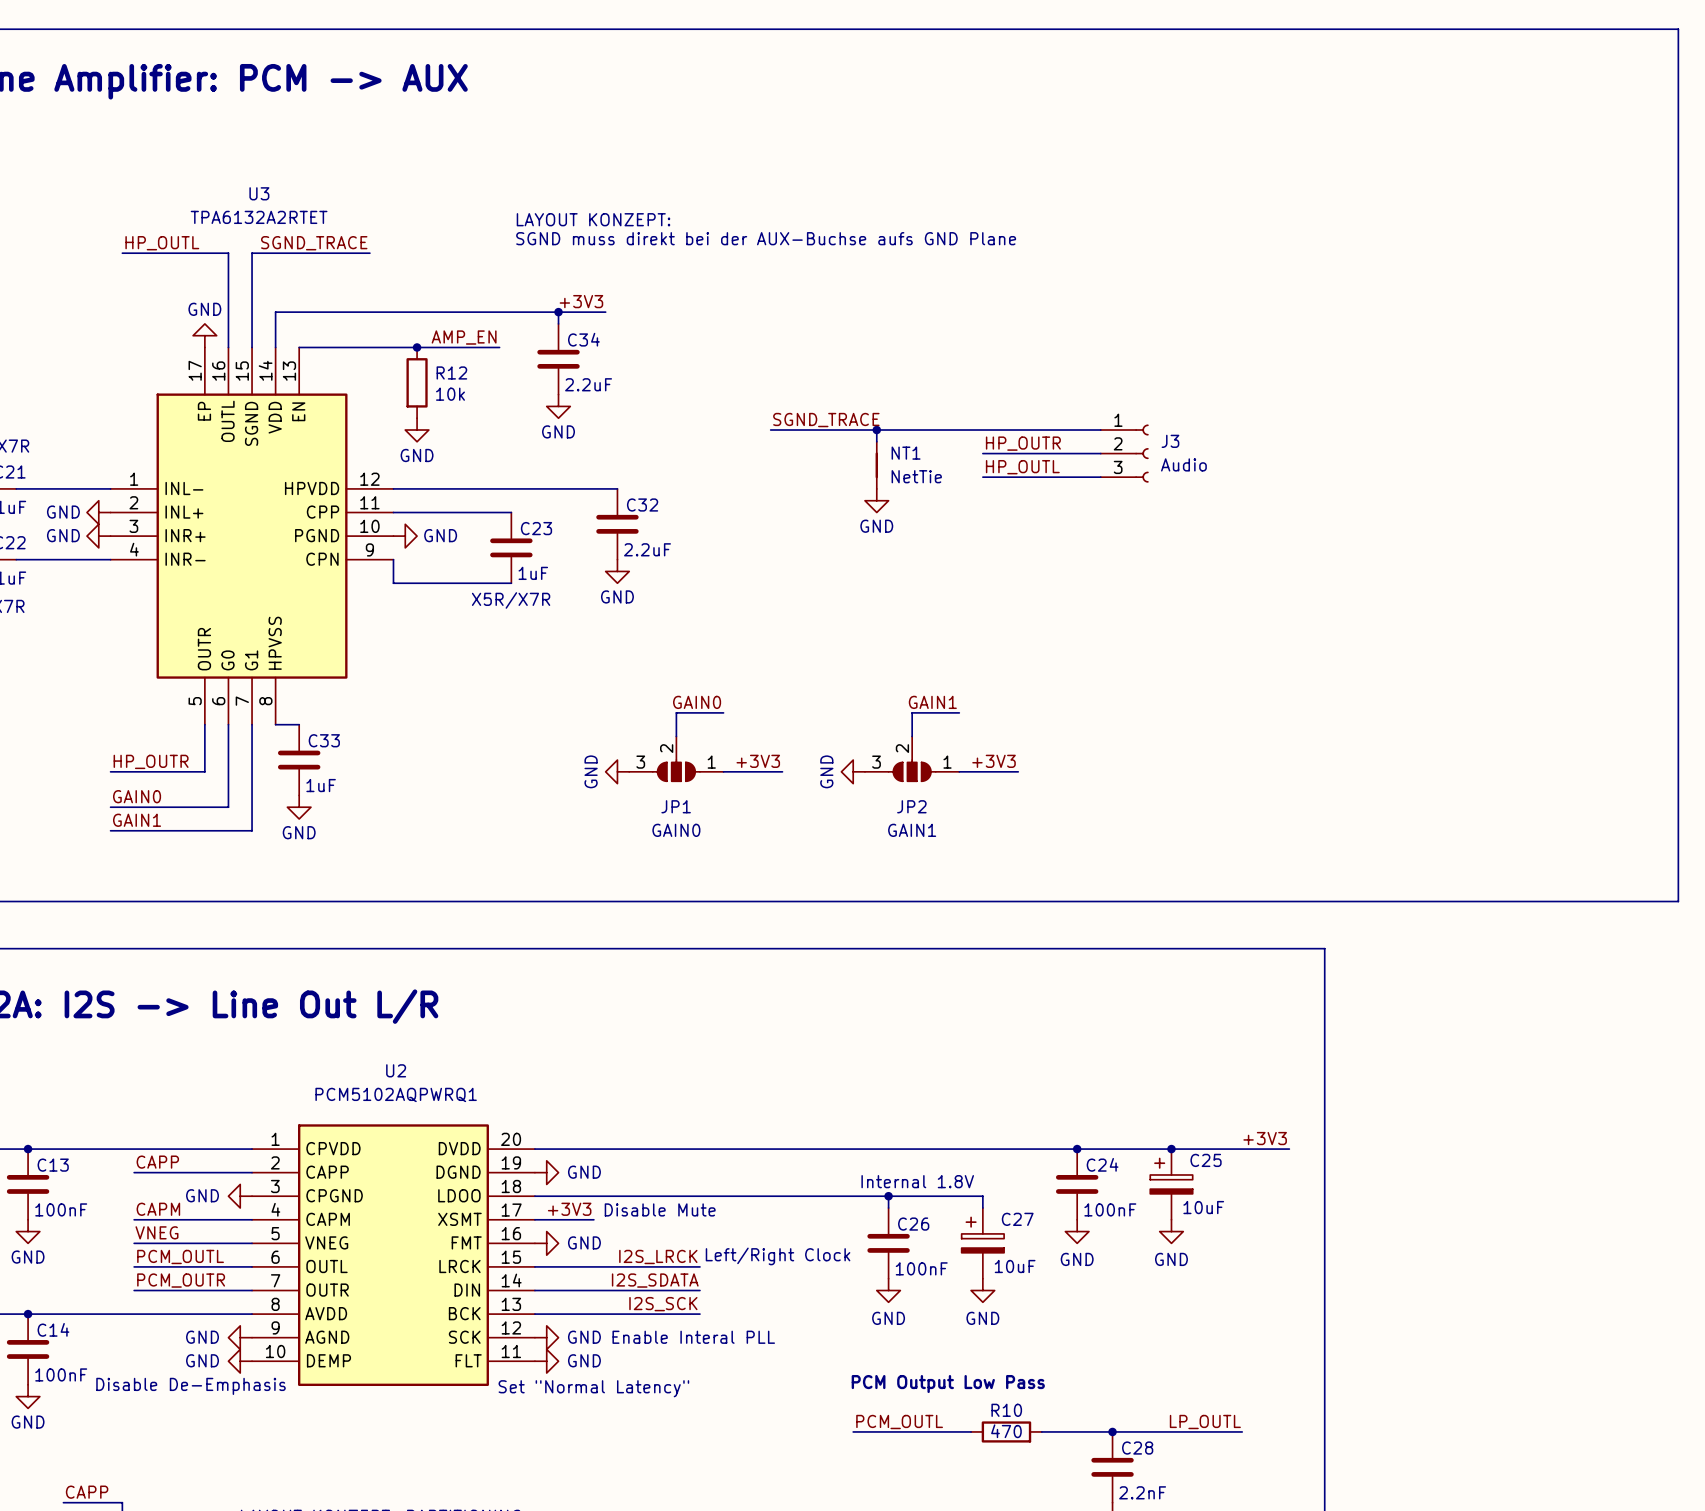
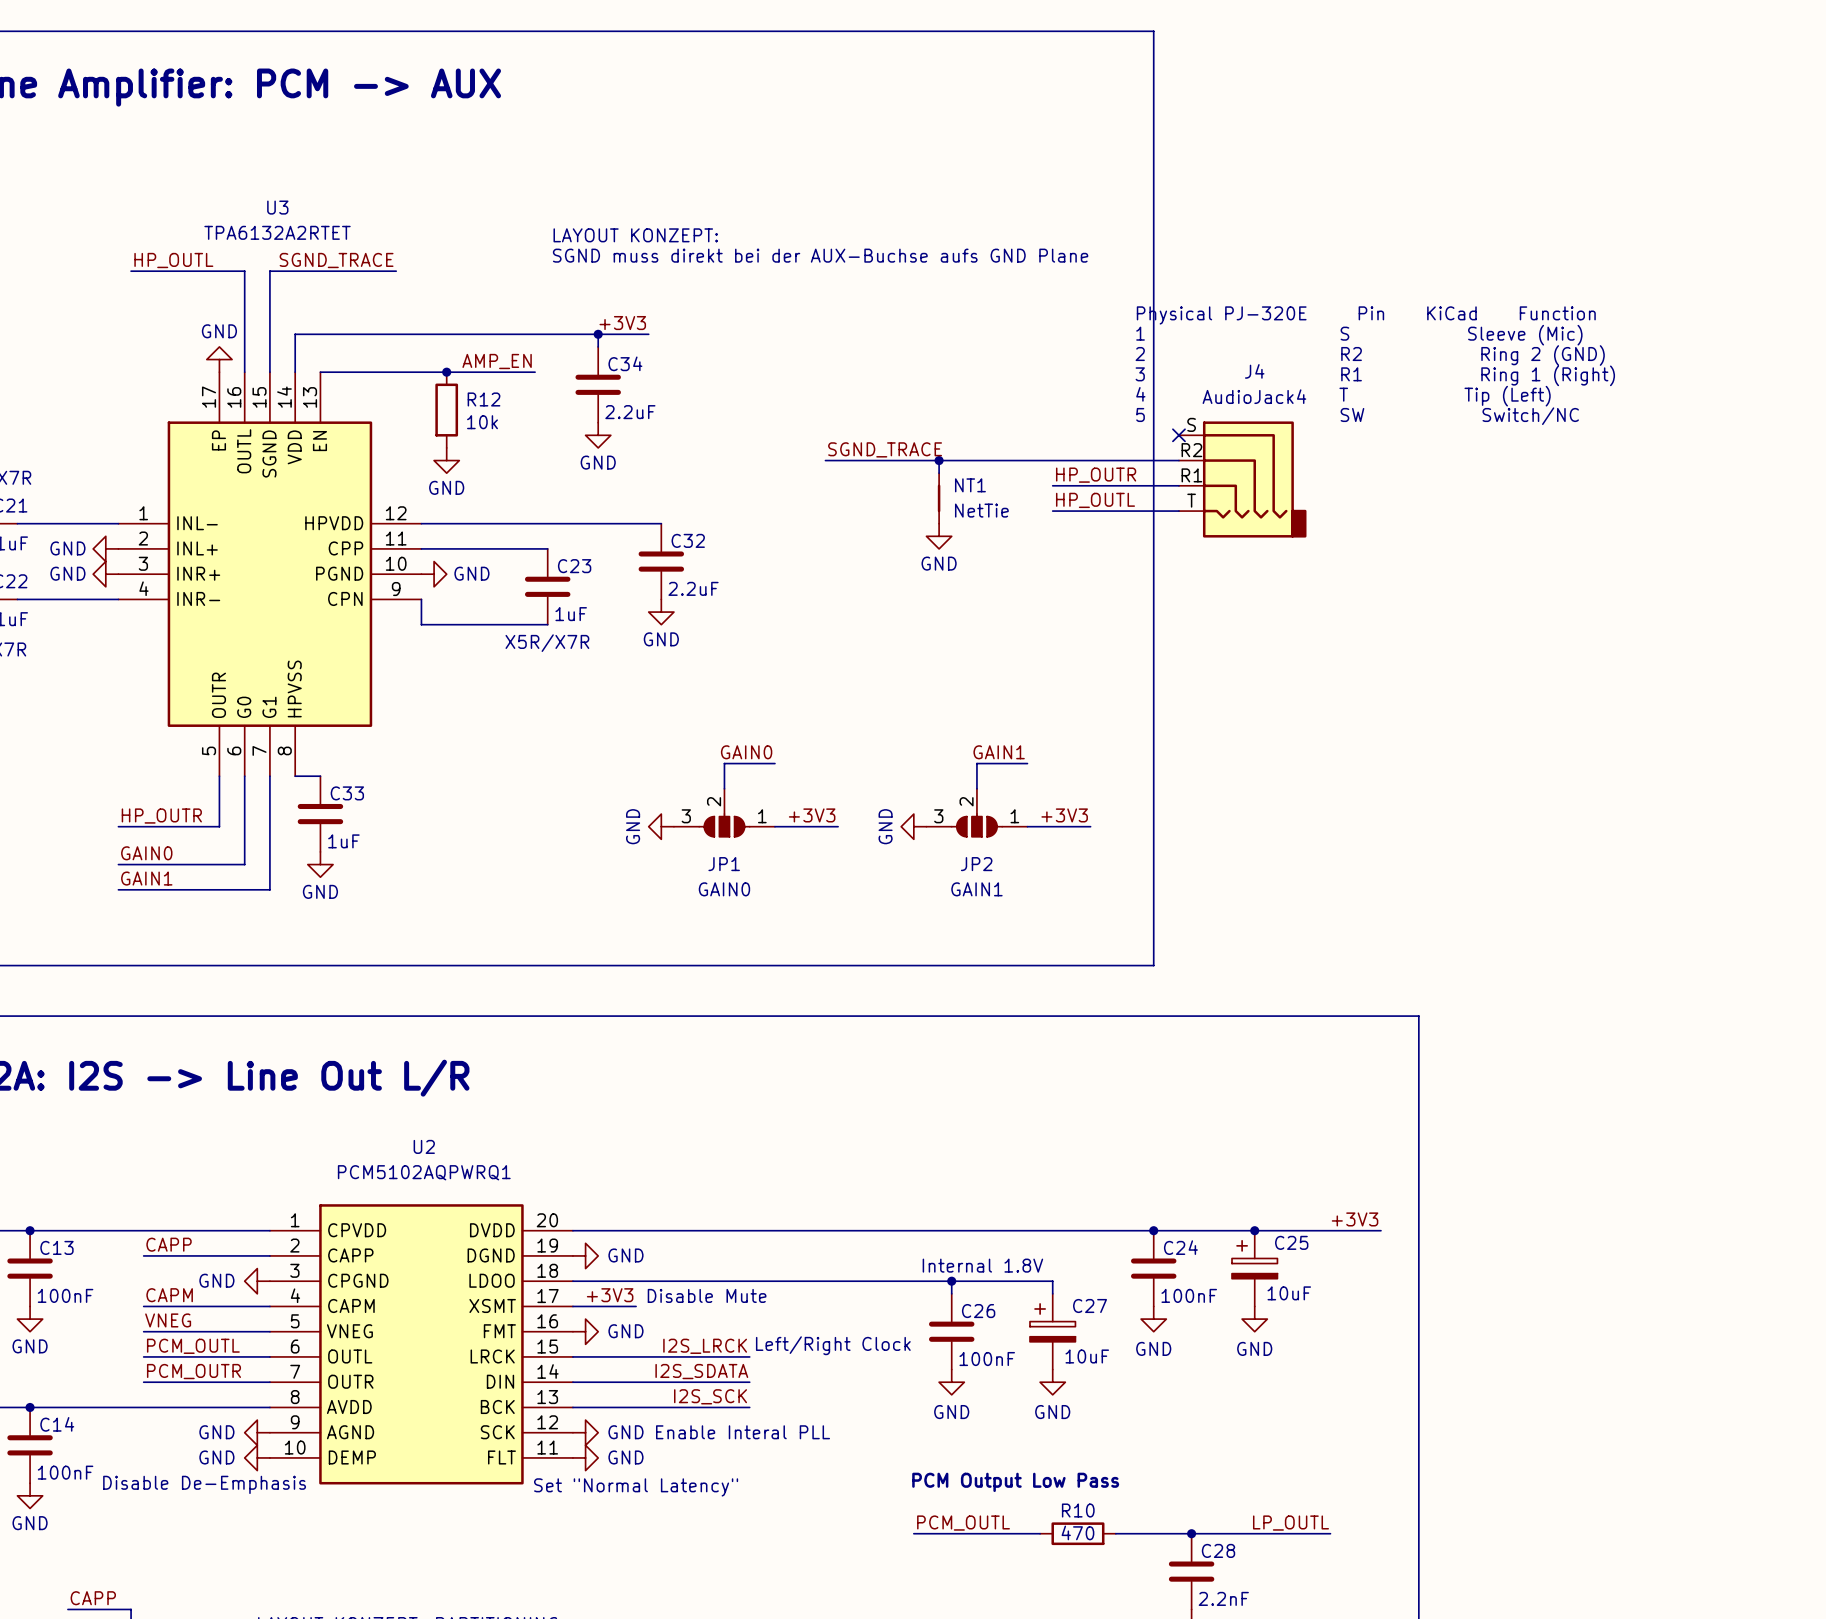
line: (1077, 29) (1678, 29) (1678, 901) (1077, 901) -> (1153, 31) (1153, 965)
text: none -> Physical PJ-320E Pin KiCad Function (1366, 315)
text: none -> 1 S Sleeve (Mic) (1359, 335)
text: none -> 2 R2 Ring 2 (GND) (1370, 355)
text: none -> 3 R1 Ring 1 (Right) (1375, 375)
text: none -> 4 T Tip (Left) (1343, 396)
text: none -> 5 SW Switch/NC (1357, 416)
no-connect mark: none -> (1178, 435)
J4: none -> AudioJack4 (1242, 479)
J3: Audio (1124, 453) -> none

